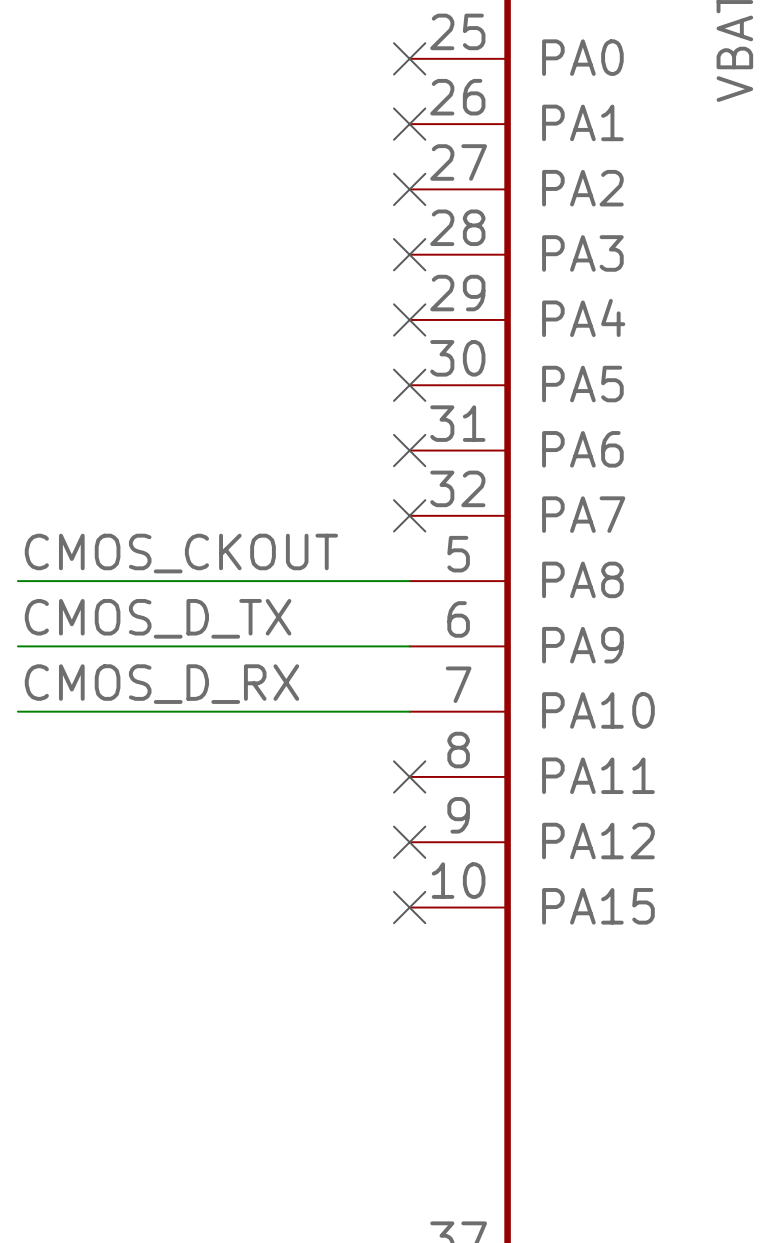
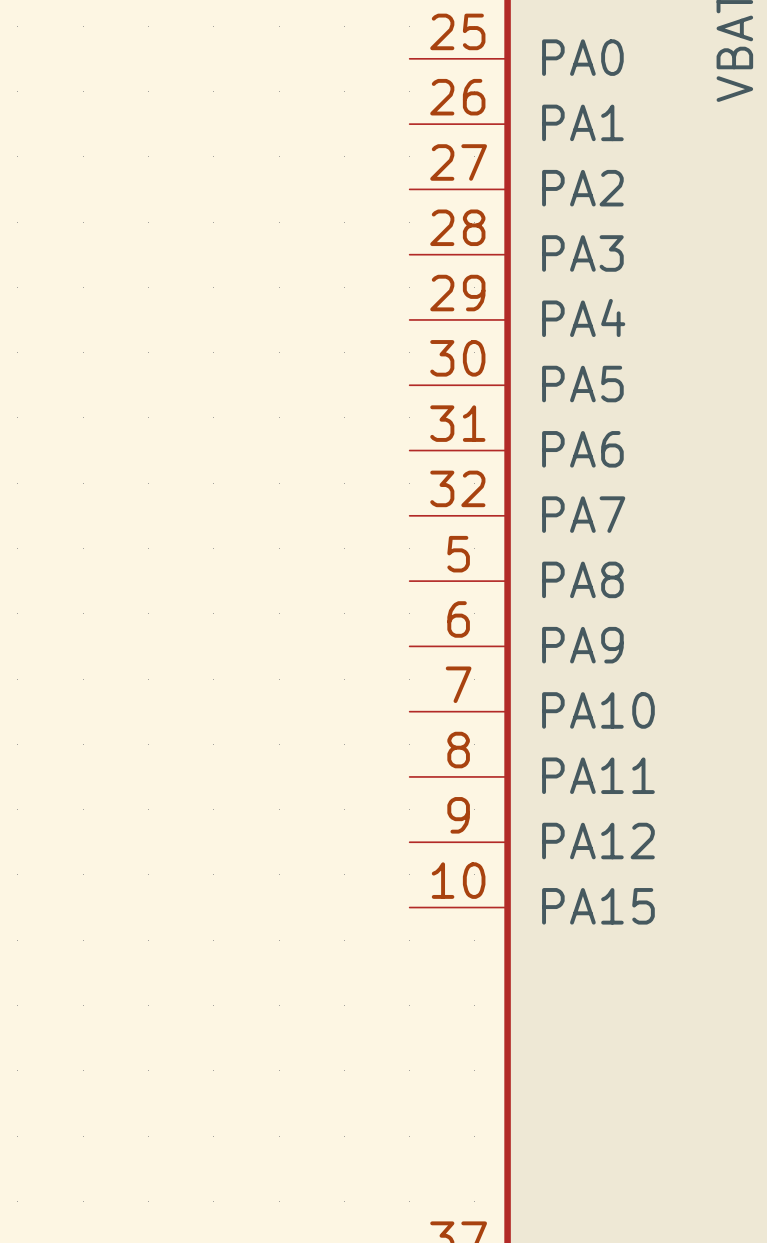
no-connect mark: (409, 58) -> none
no-connect mark: (409, 124) -> none
no-connect mark: (409, 189) -> none
no-connect mark: (409, 254) -> none
no-connect mark: (409, 319) -> none
no-connect mark: (409, 385) -> none
no-connect mark: (409, 450) -> none
no-connect mark: (409, 515) -> none
label: CMOS_CKOUT (181, 553) -> none
wire: (17, 581) (409, 581) -> none
label: CMOS_D_TX (158, 618) -> none
wire: (17, 646) (409, 646) -> none
label: CMOS_D_RX (161, 684) -> none
wire: (17, 711) (409, 711) -> none
no-connect mark: (409, 776) -> none
no-connect mark: (409, 842) -> none
no-connect mark: (409, 907) -> none

